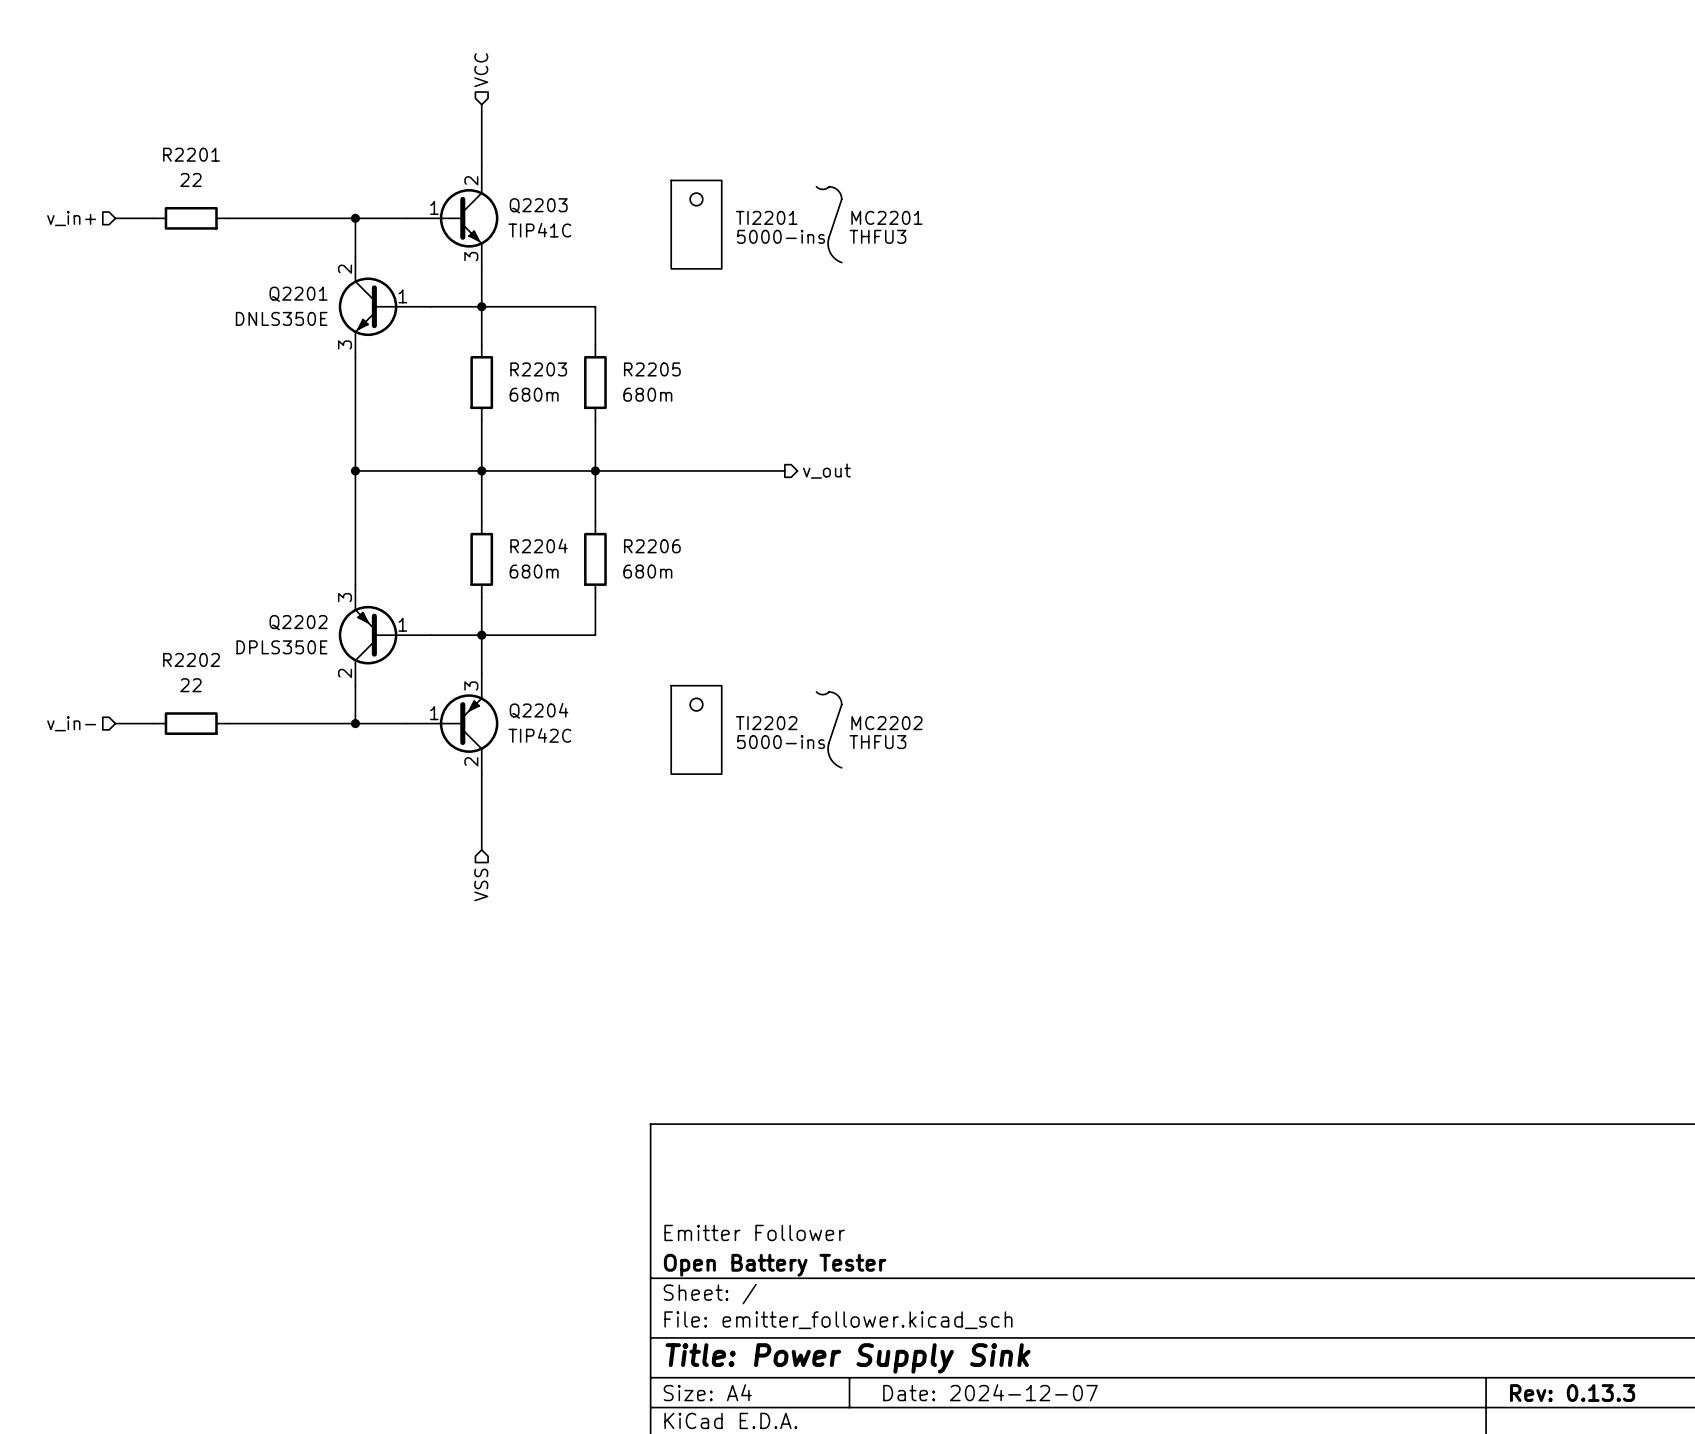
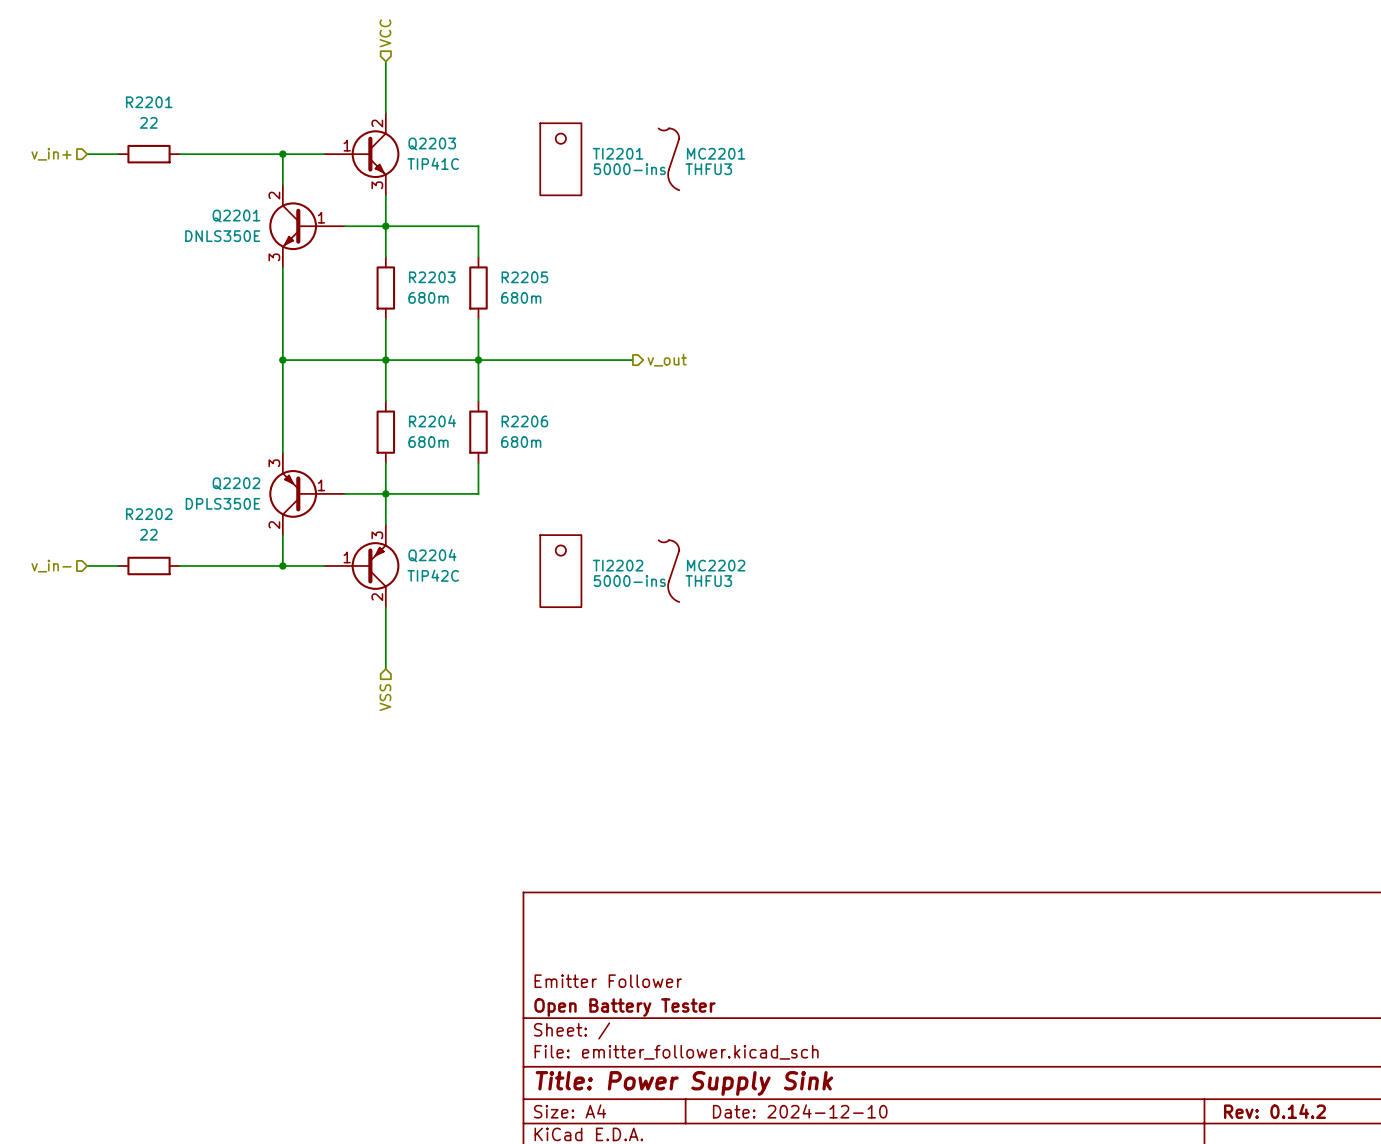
title block: Date: 2024-12-07 (990, 1392) -> Date: 2024-12-10 (800, 1111)
title block: Rev: 0.13.3 (1572, 1393) -> Rev: 0.14.2 (1274, 1111)

